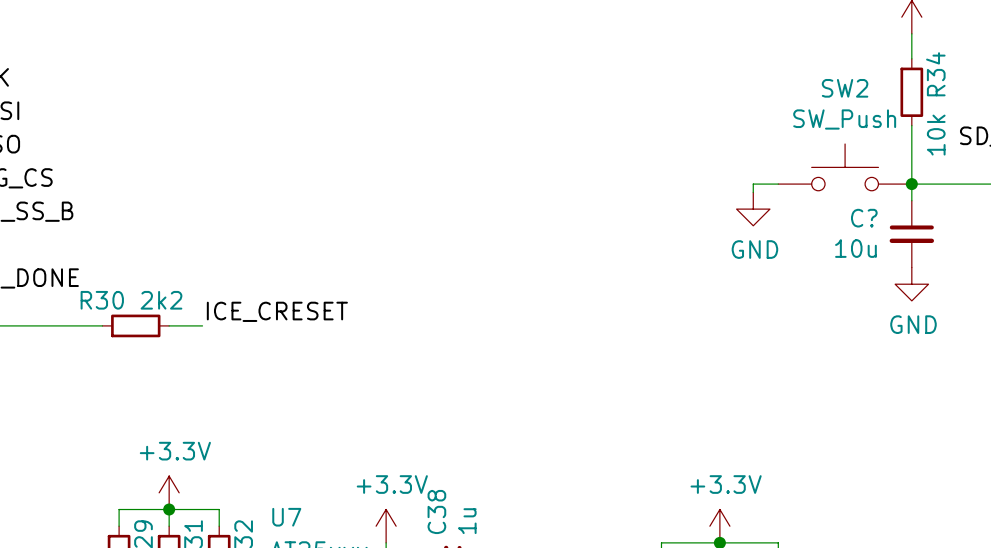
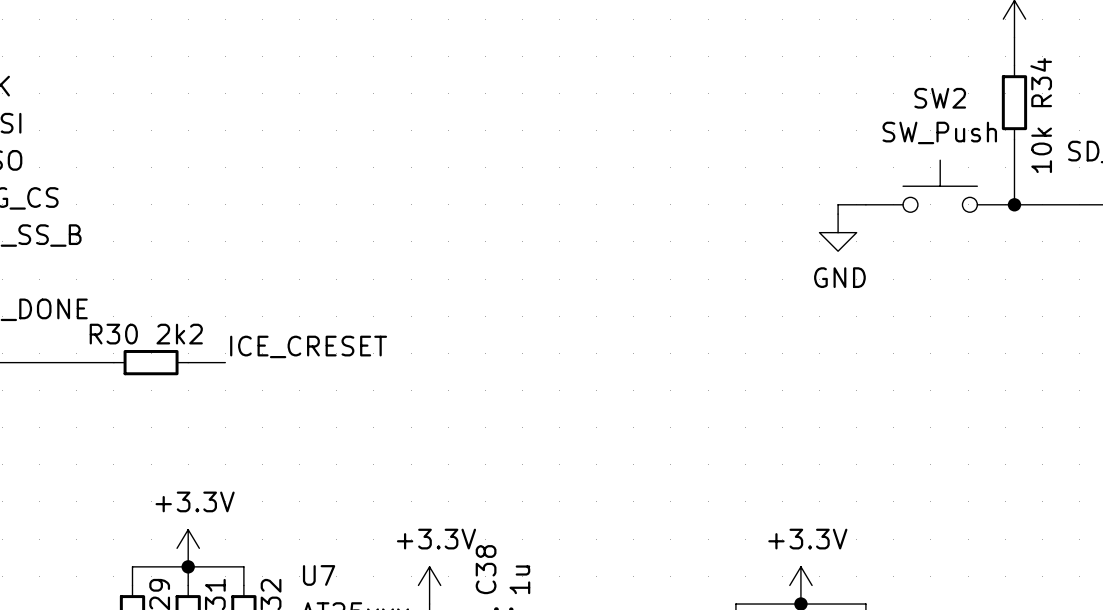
wire: (911, 184) (911, 200) -> none
C?: 10u (911, 234) -> none
power symbol: GND (911, 284) -> none

